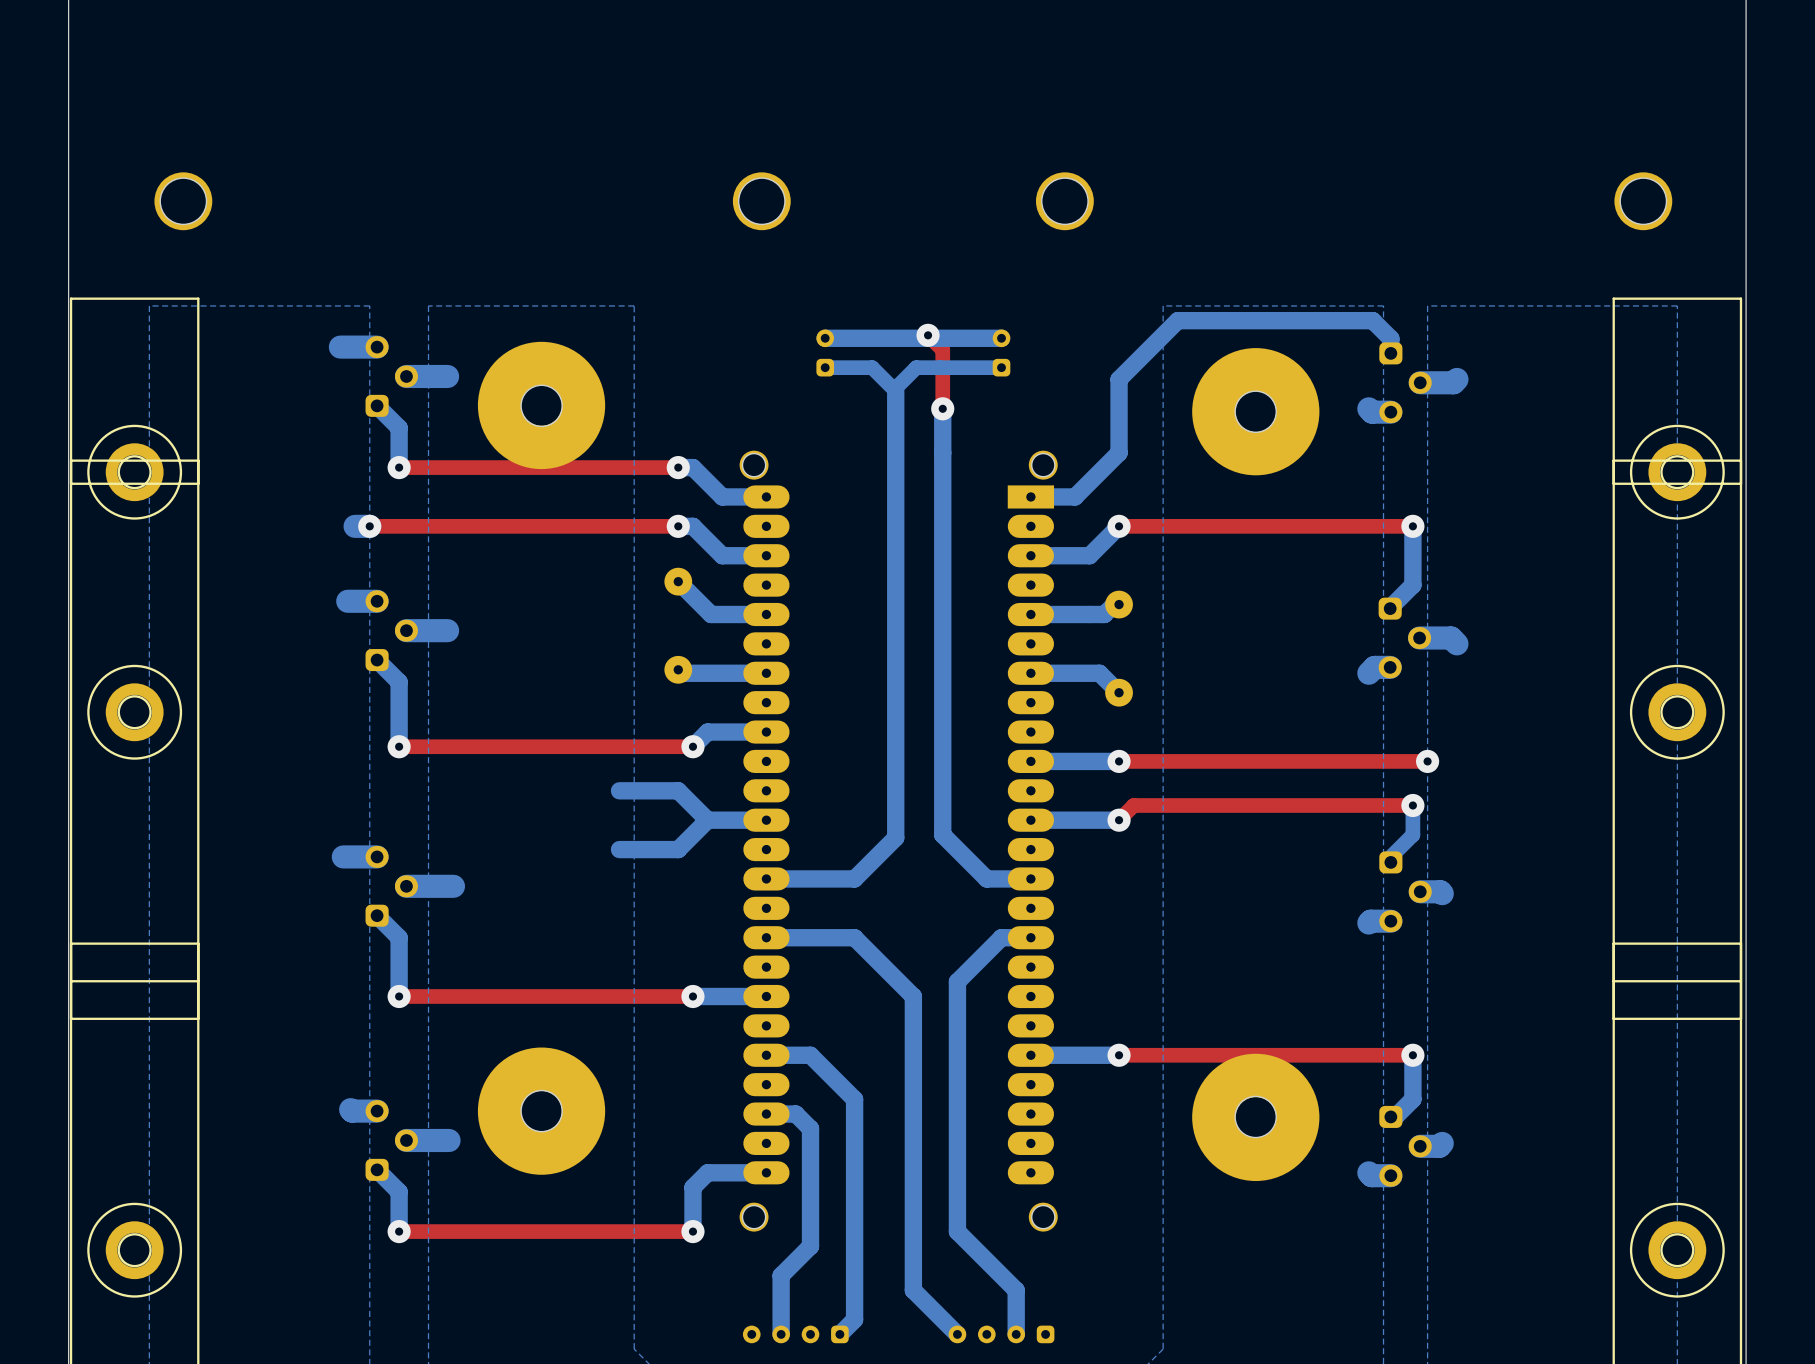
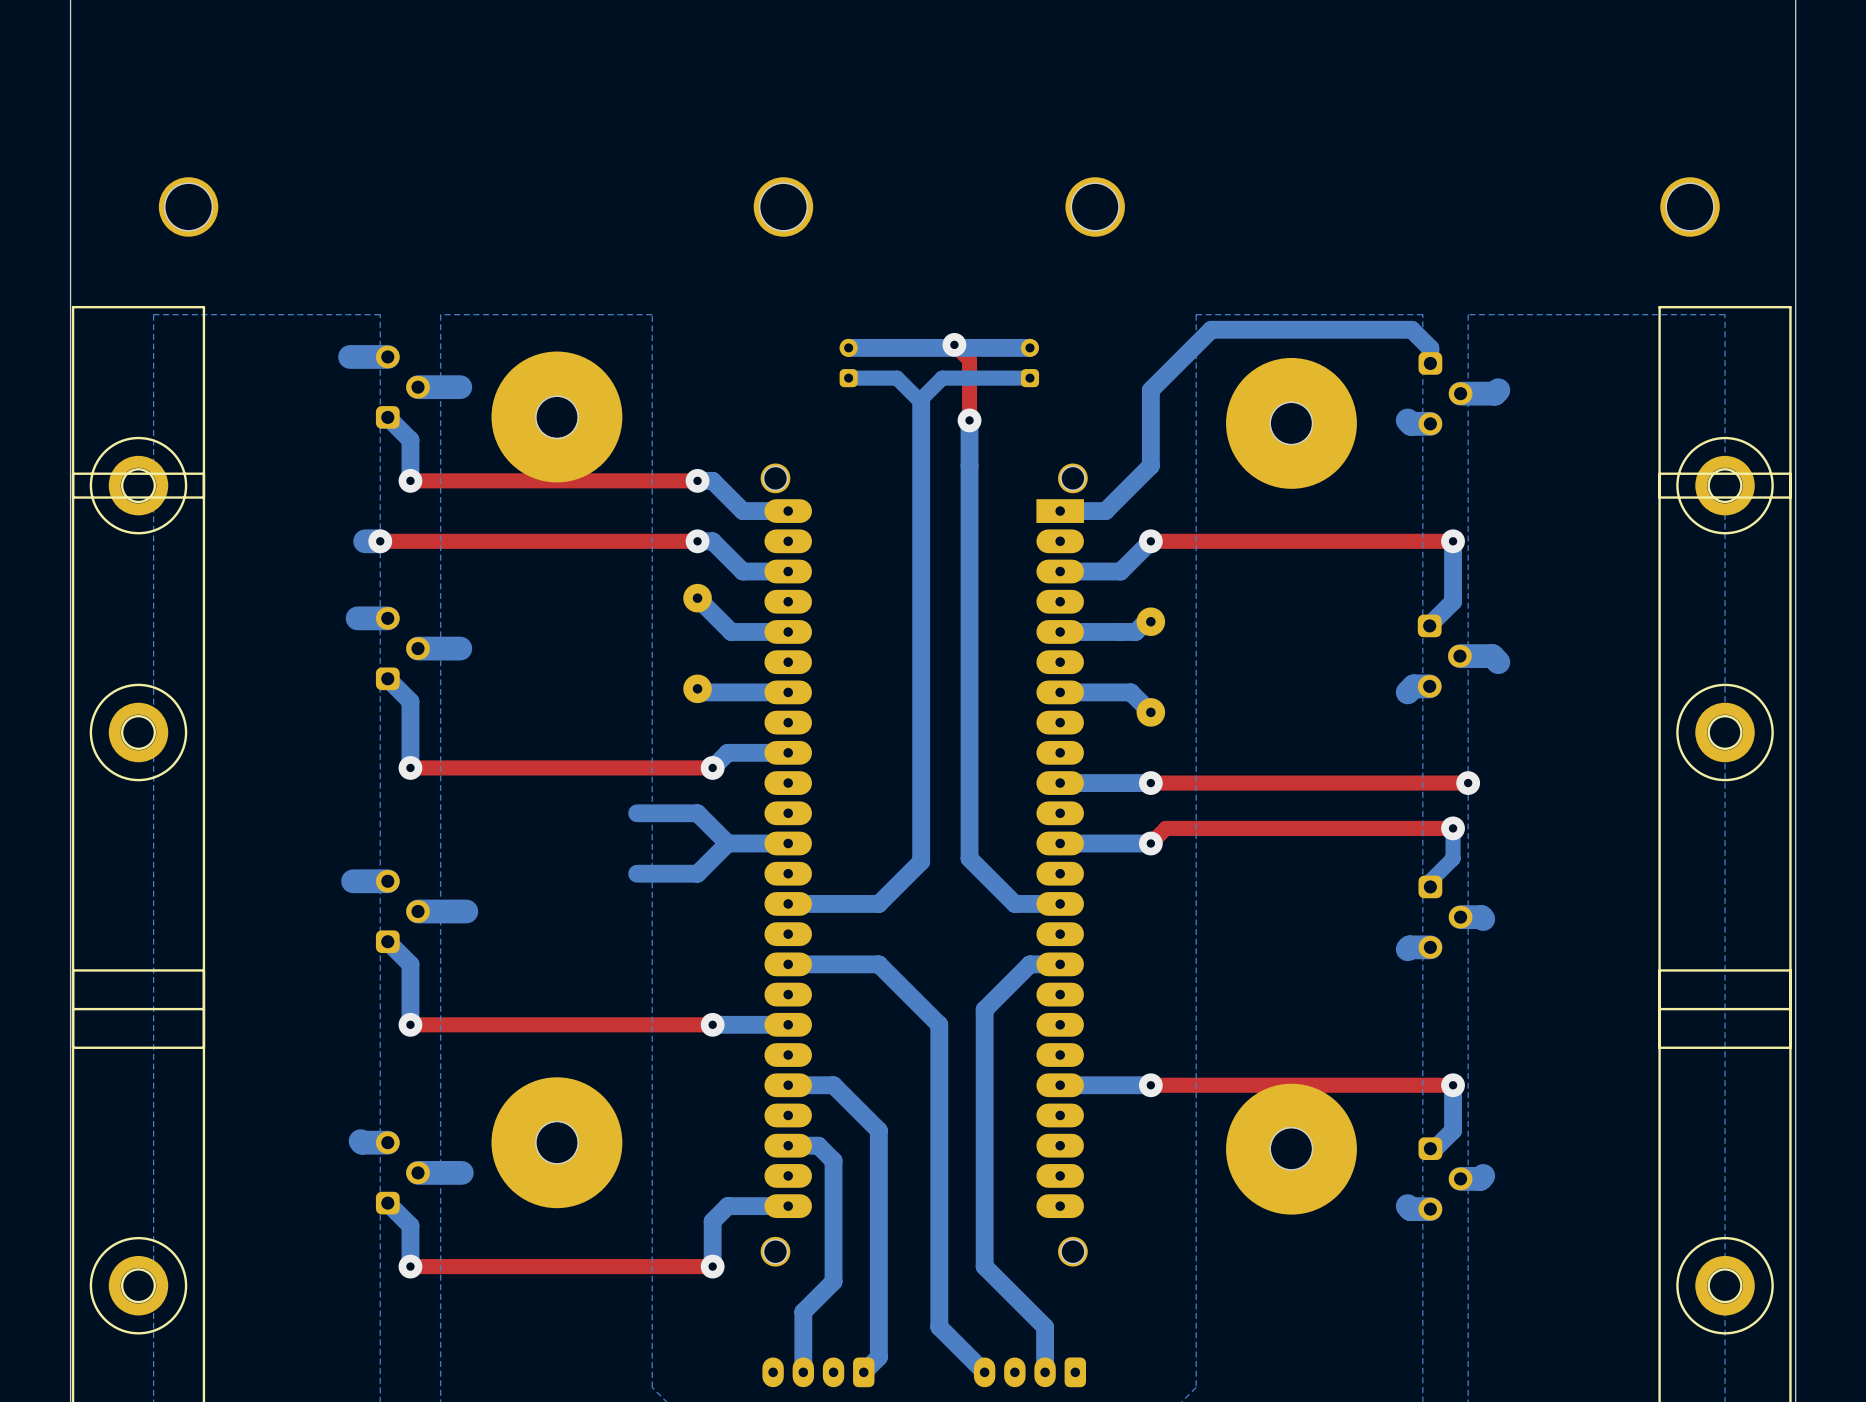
part footprint: [742, 1325, 849, 1344] -> [762, 1357, 875, 1388]
part footprint: [948, 1325, 1055, 1344] -> [973, 1357, 1087, 1388]

